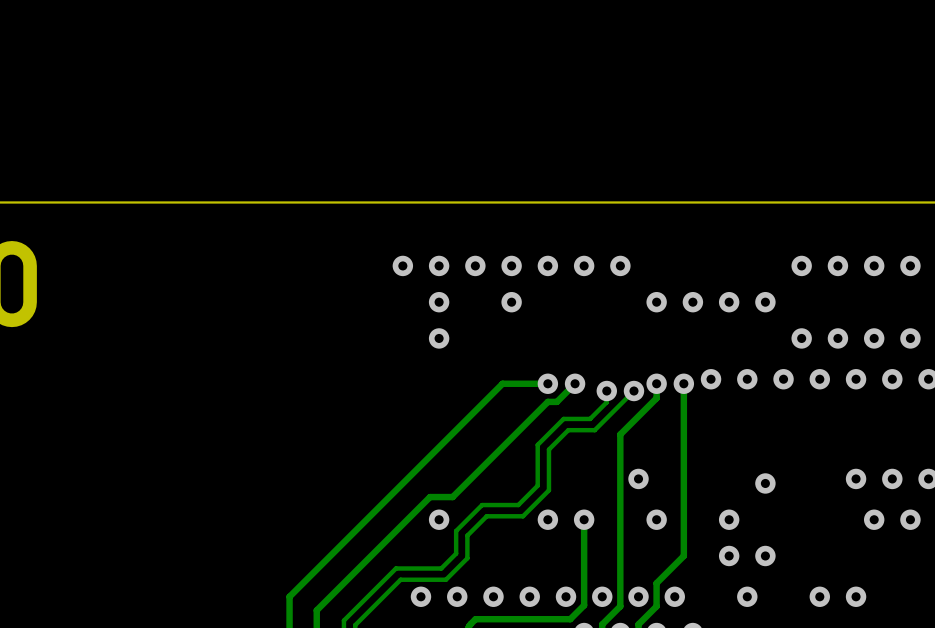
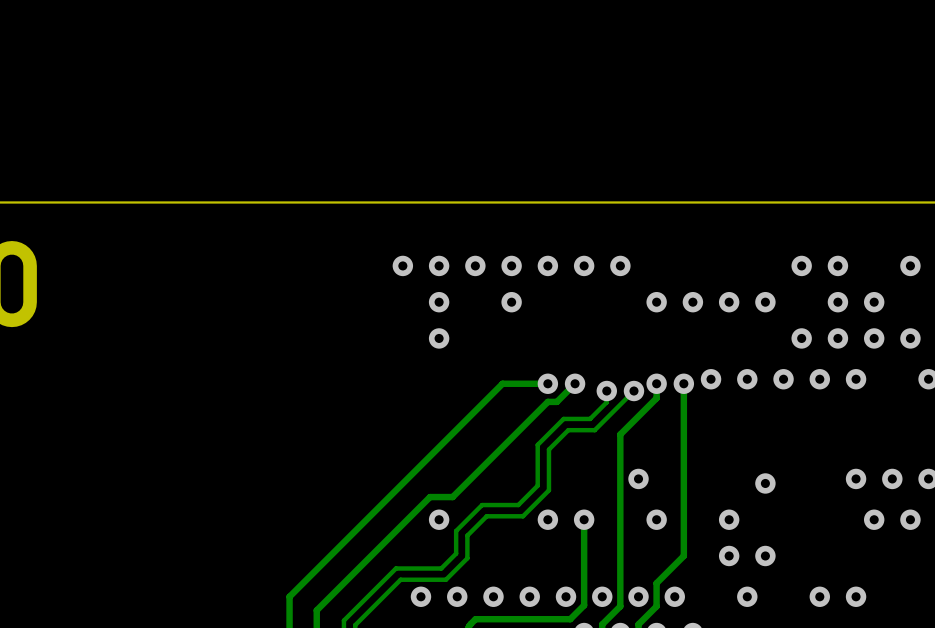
via: (874, 265) -> none
via: none -> (837, 302)
via: none -> (874, 302)
via: (892, 379) -> none

